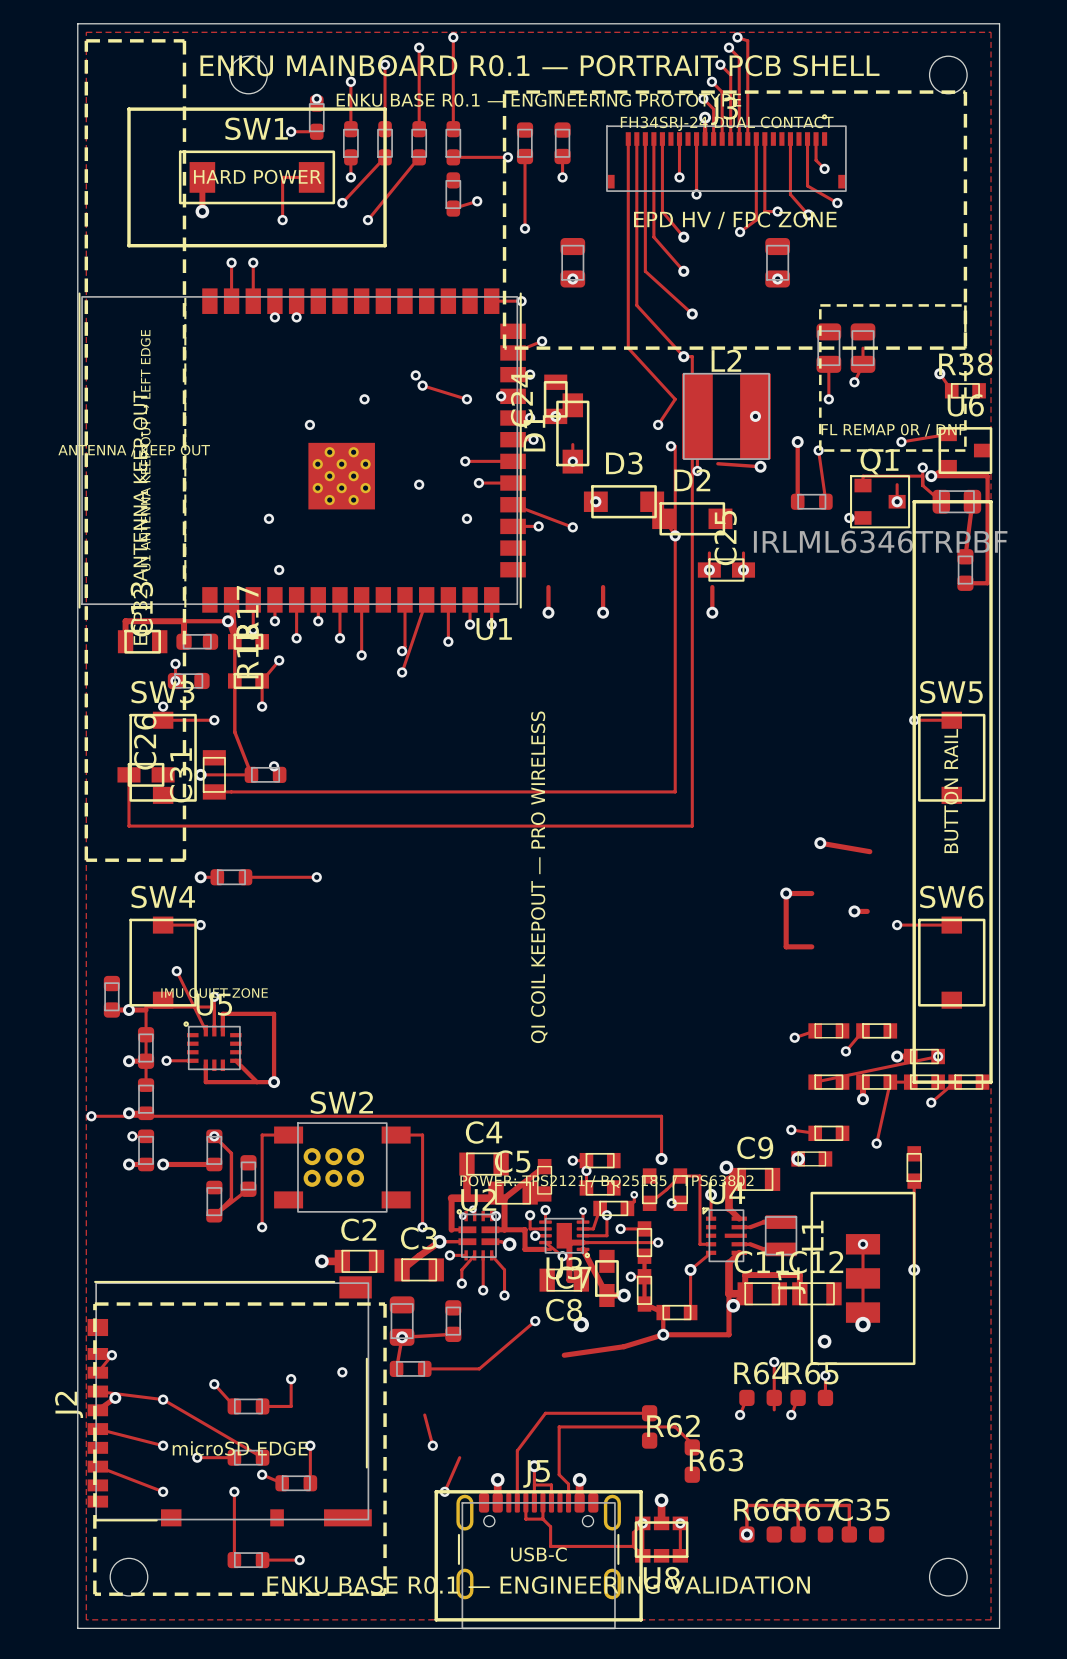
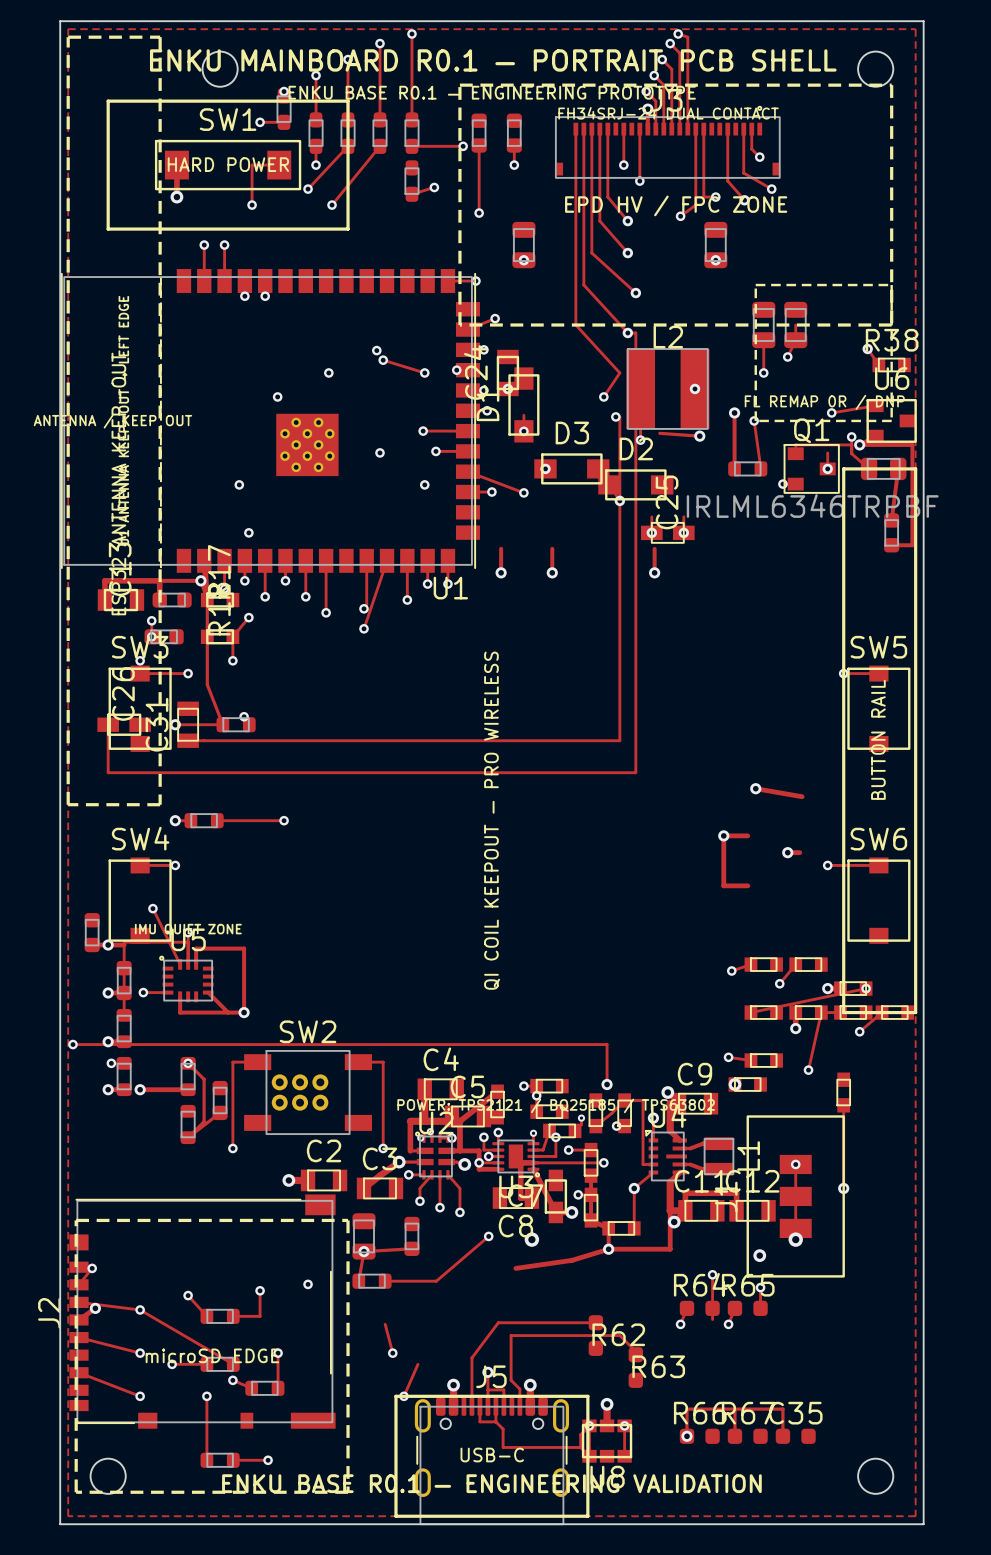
track: (545, 1242) (562, 1256) -> (498, 1162) (479, 1162)
via position: (562, 1256) -> (479, 1162)

